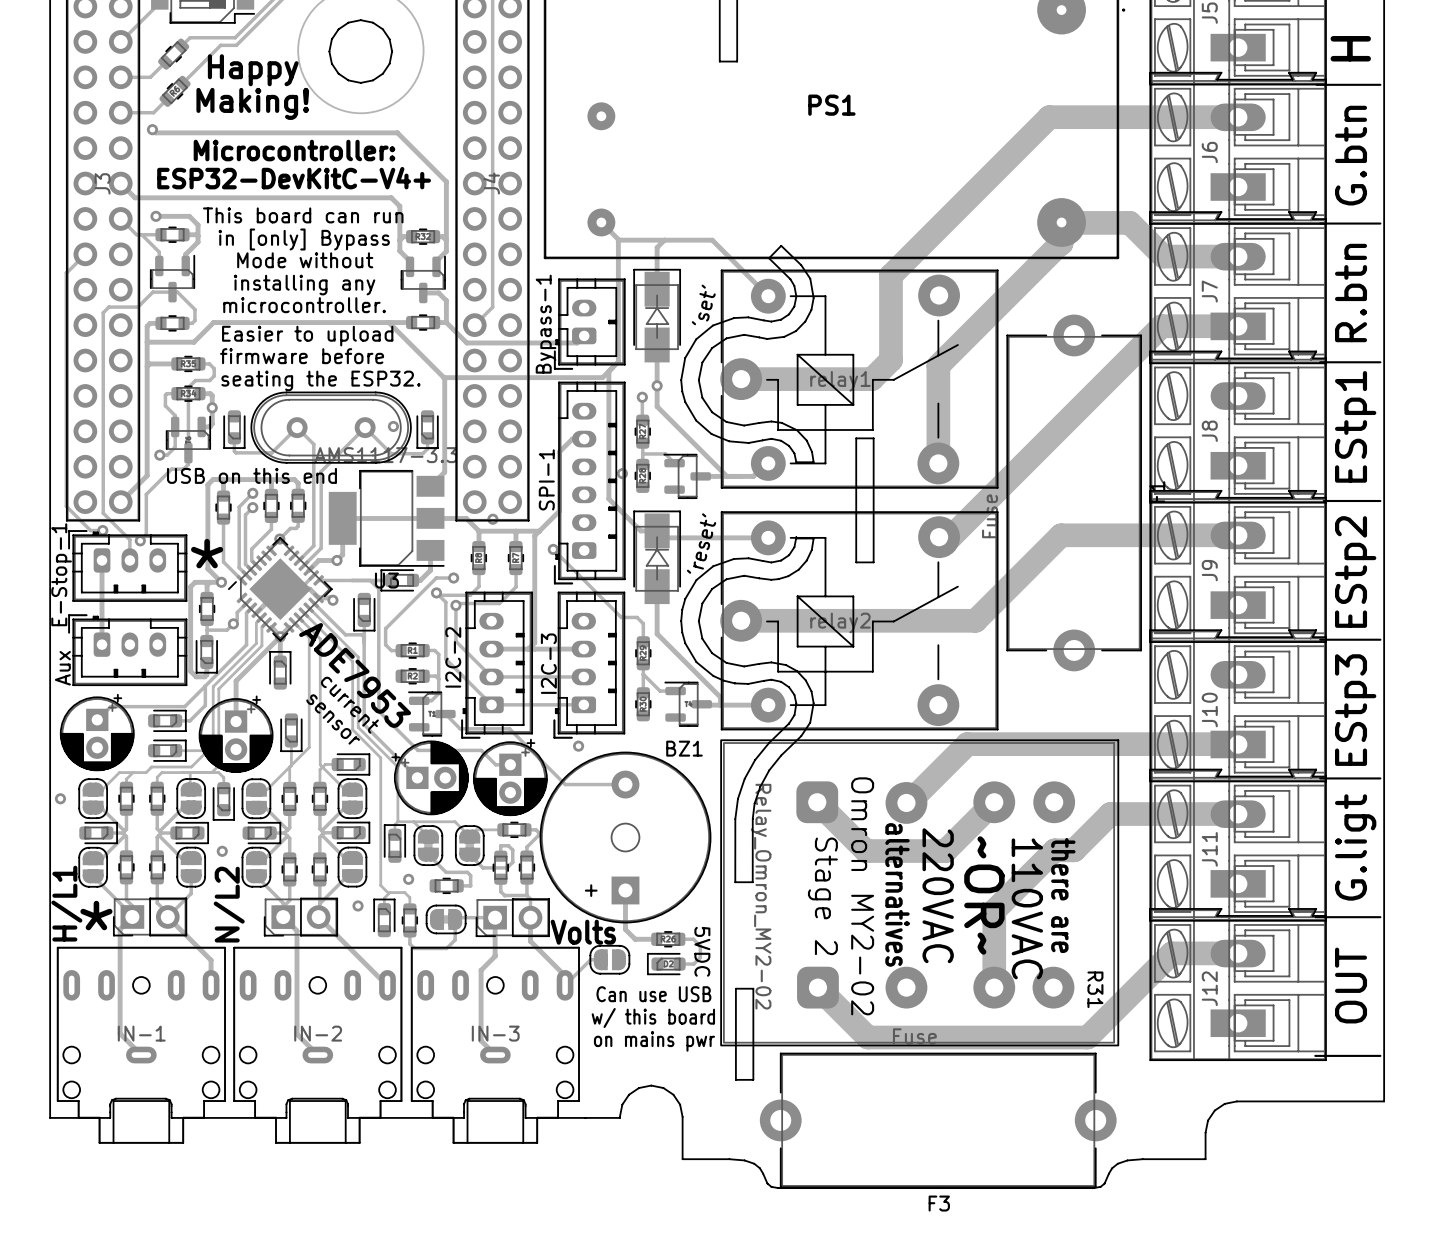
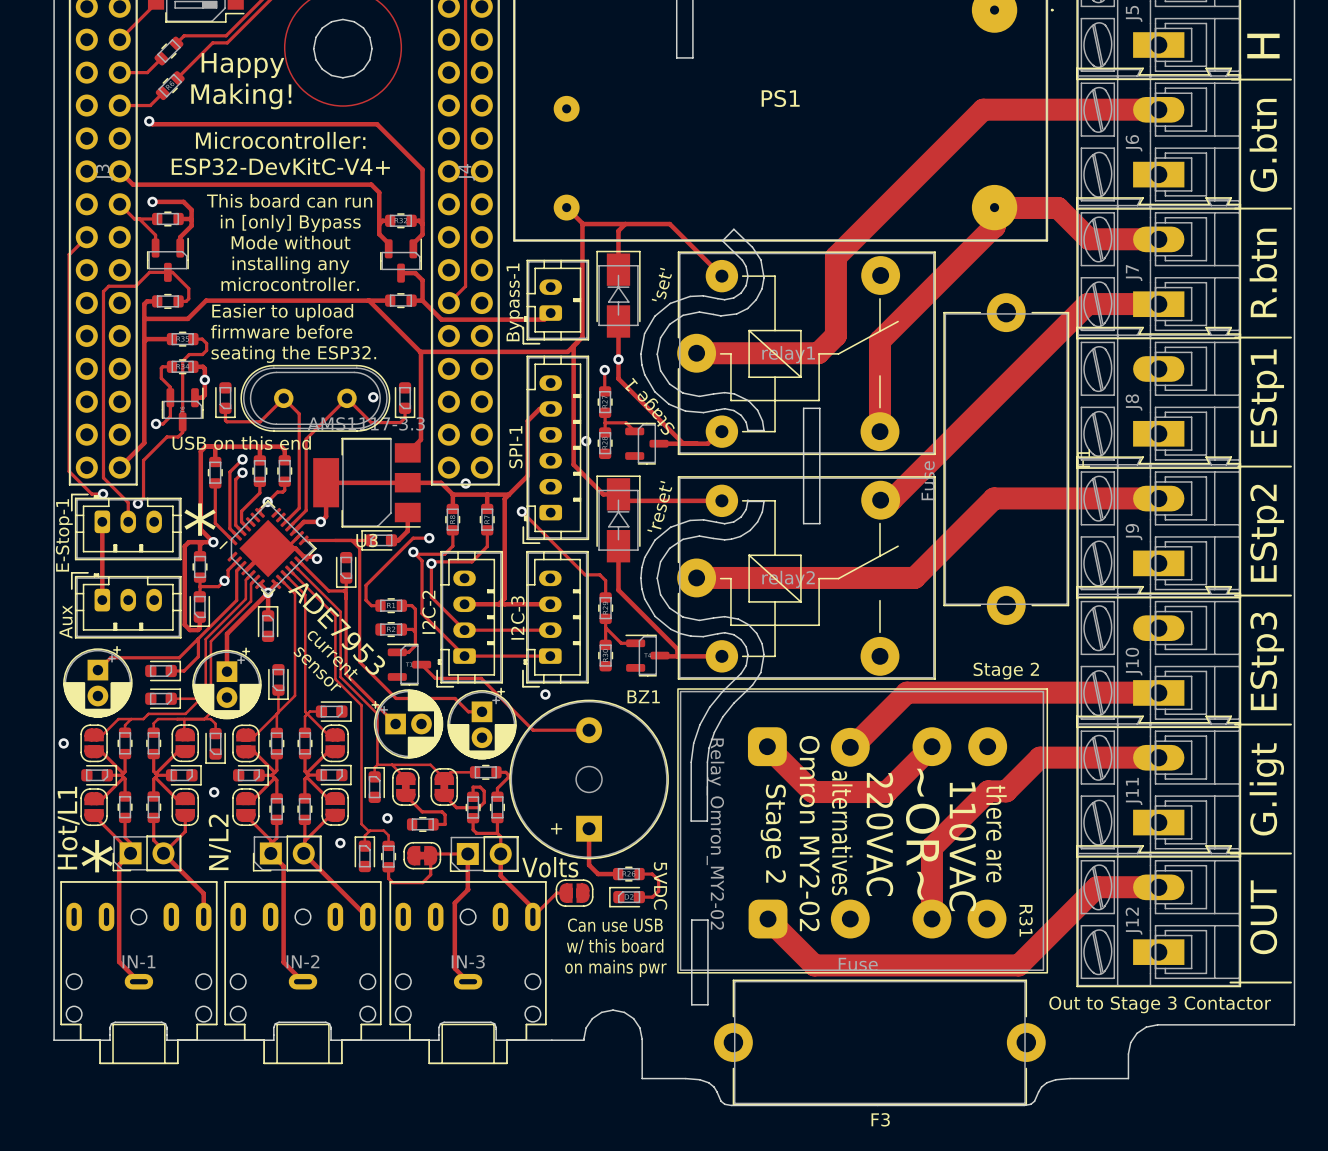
text: none -> Stage 1 (649, 406)
text: none -> Stage 2 (1006, 671)
text: H/L1 (66, 903) -> Hot/L1 (68, 828)
text: none -> Out to Stage 3 Contactor (1160, 1004)

